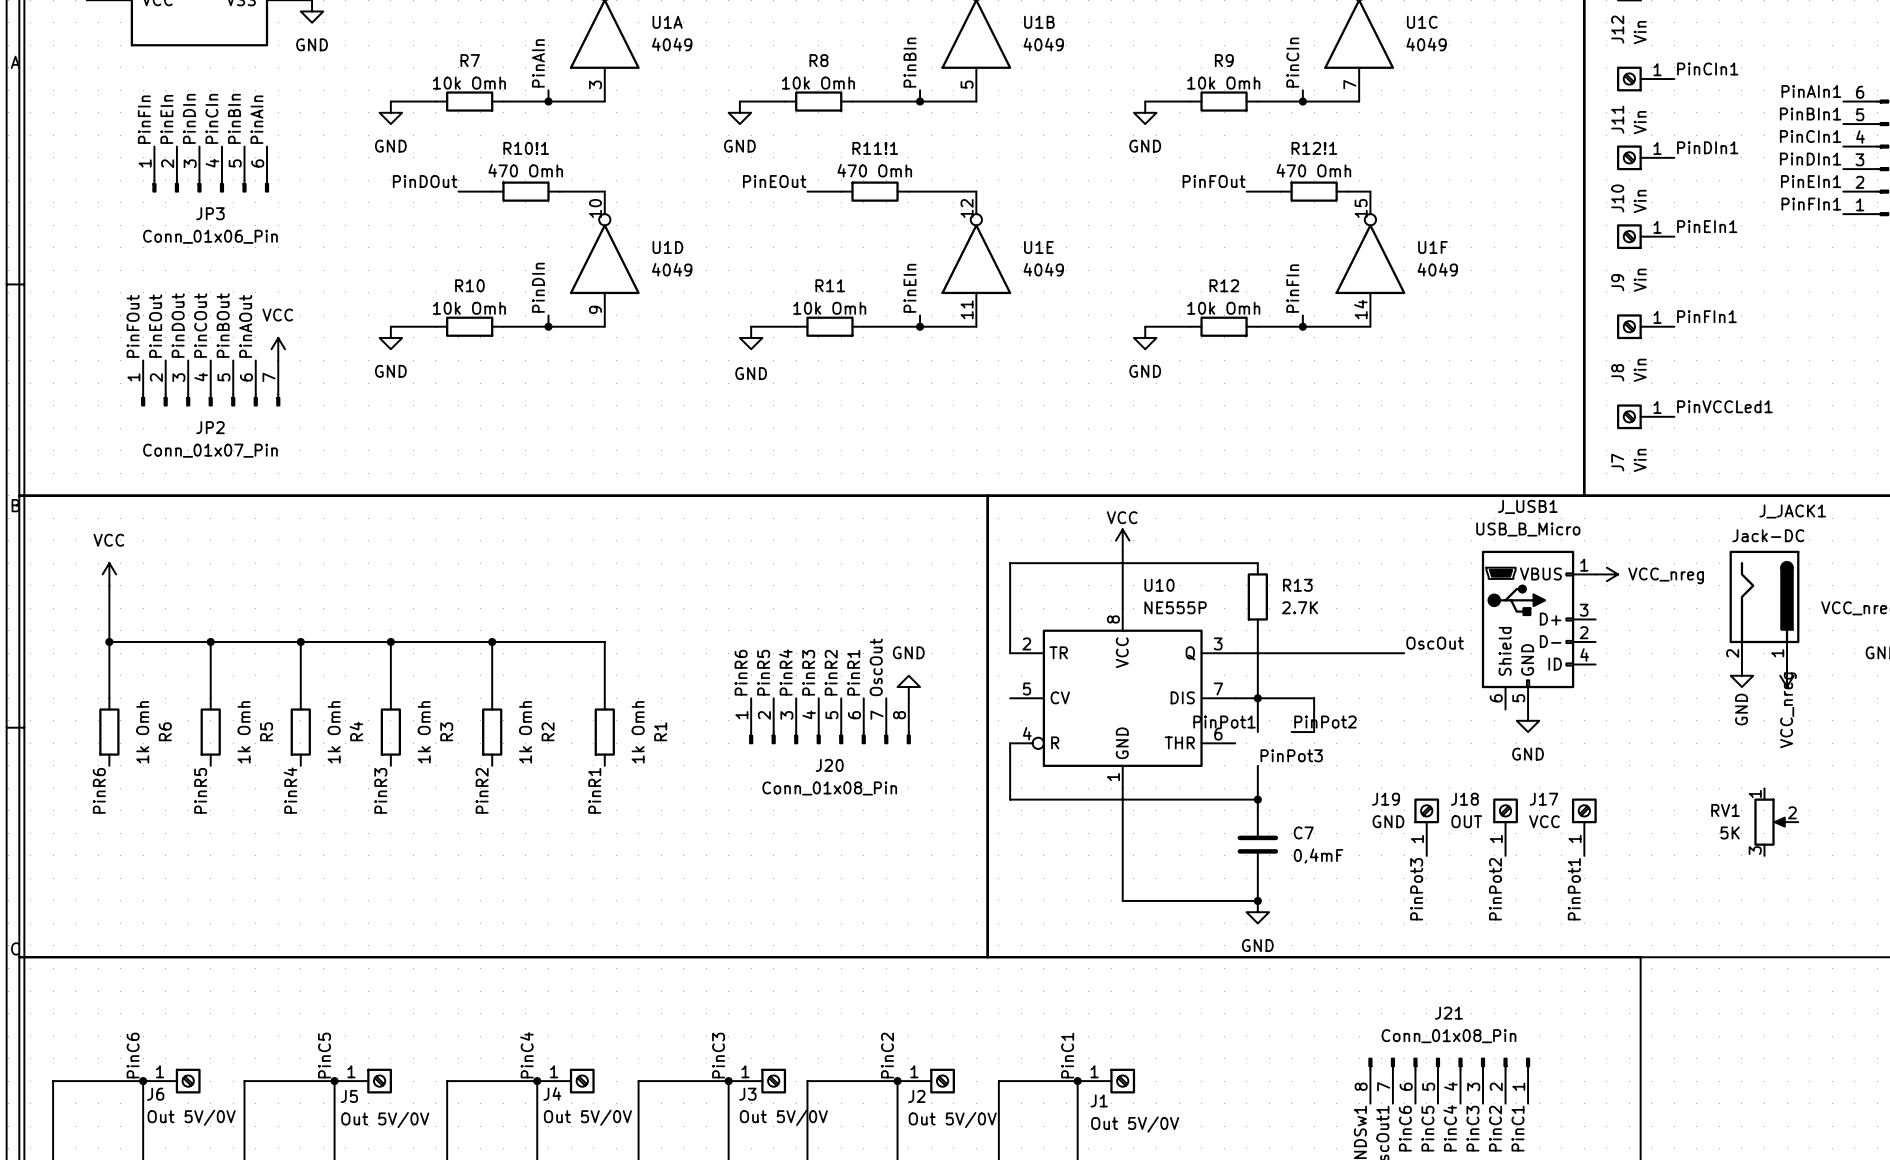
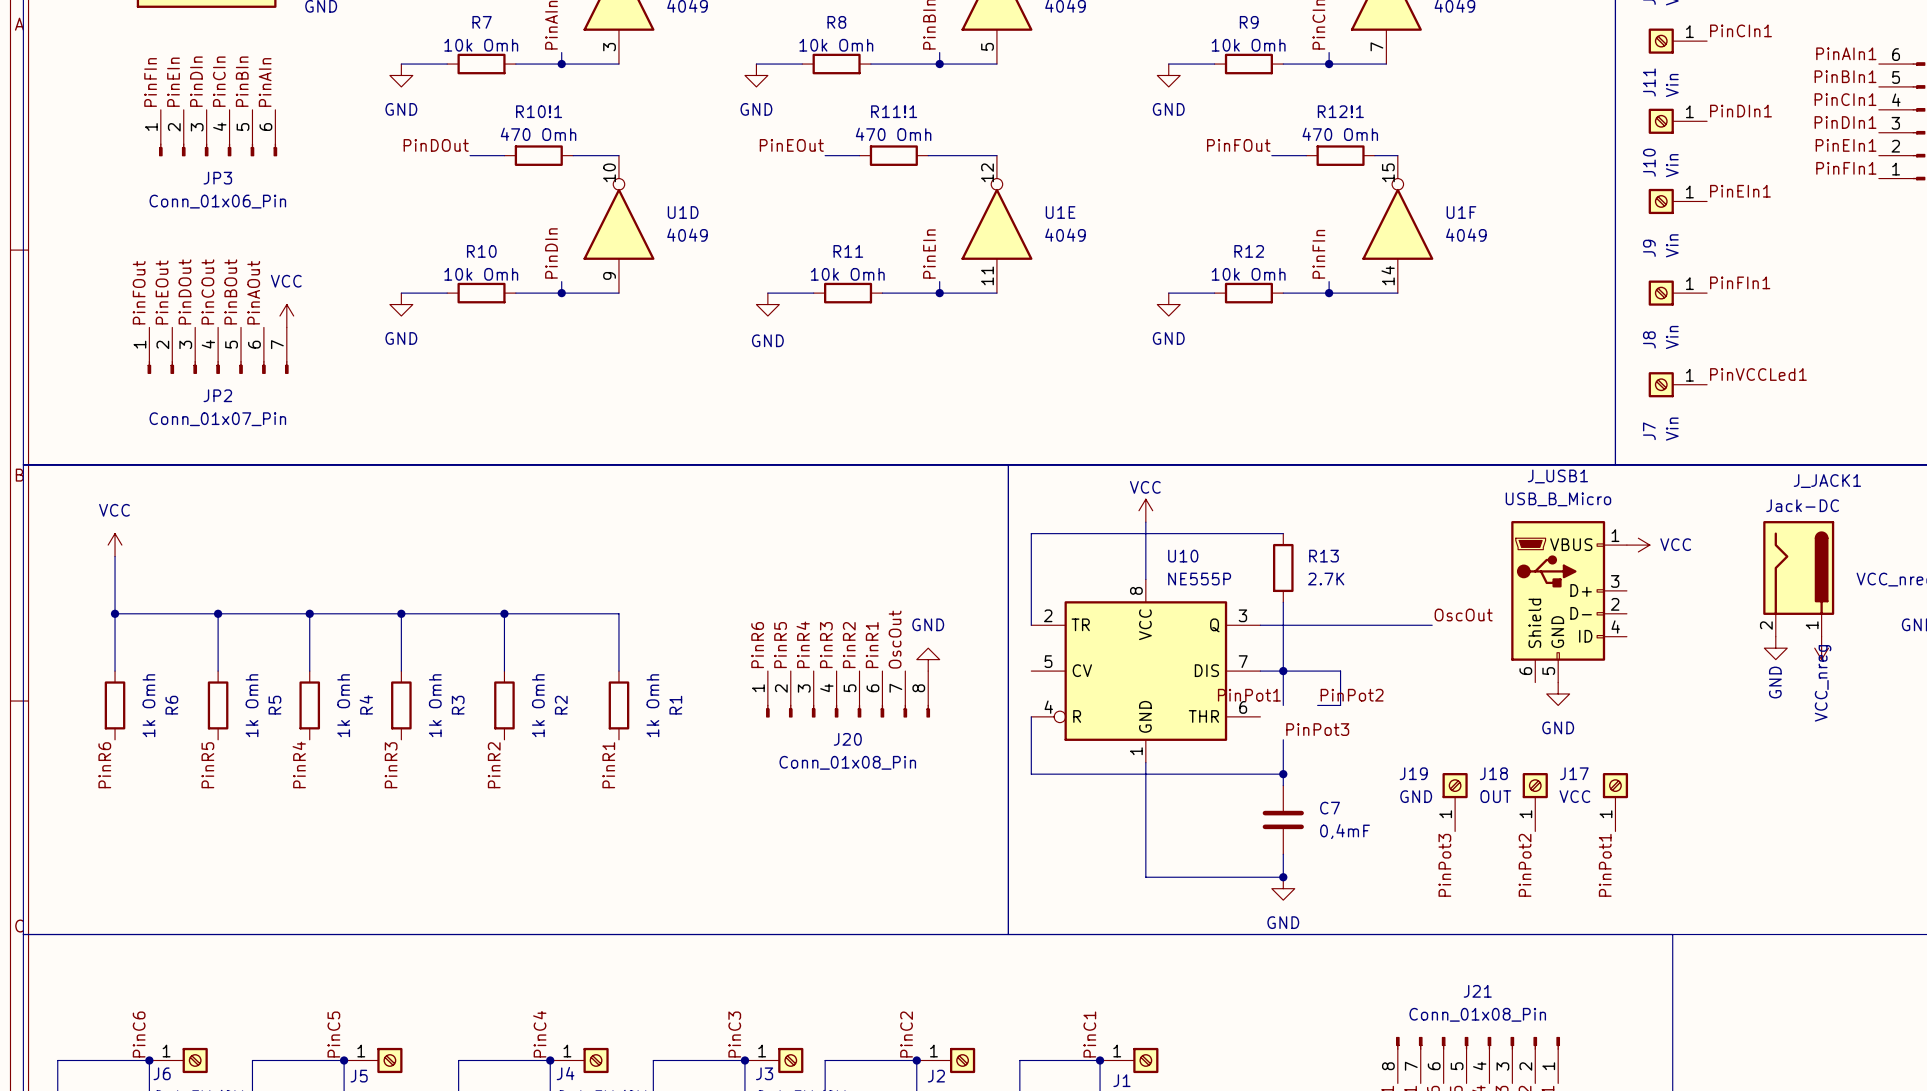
power symbol: VCC_nreg (1606, 574) -> VCC (1638, 545)
RV1: 5K (1776, 822) -> none

